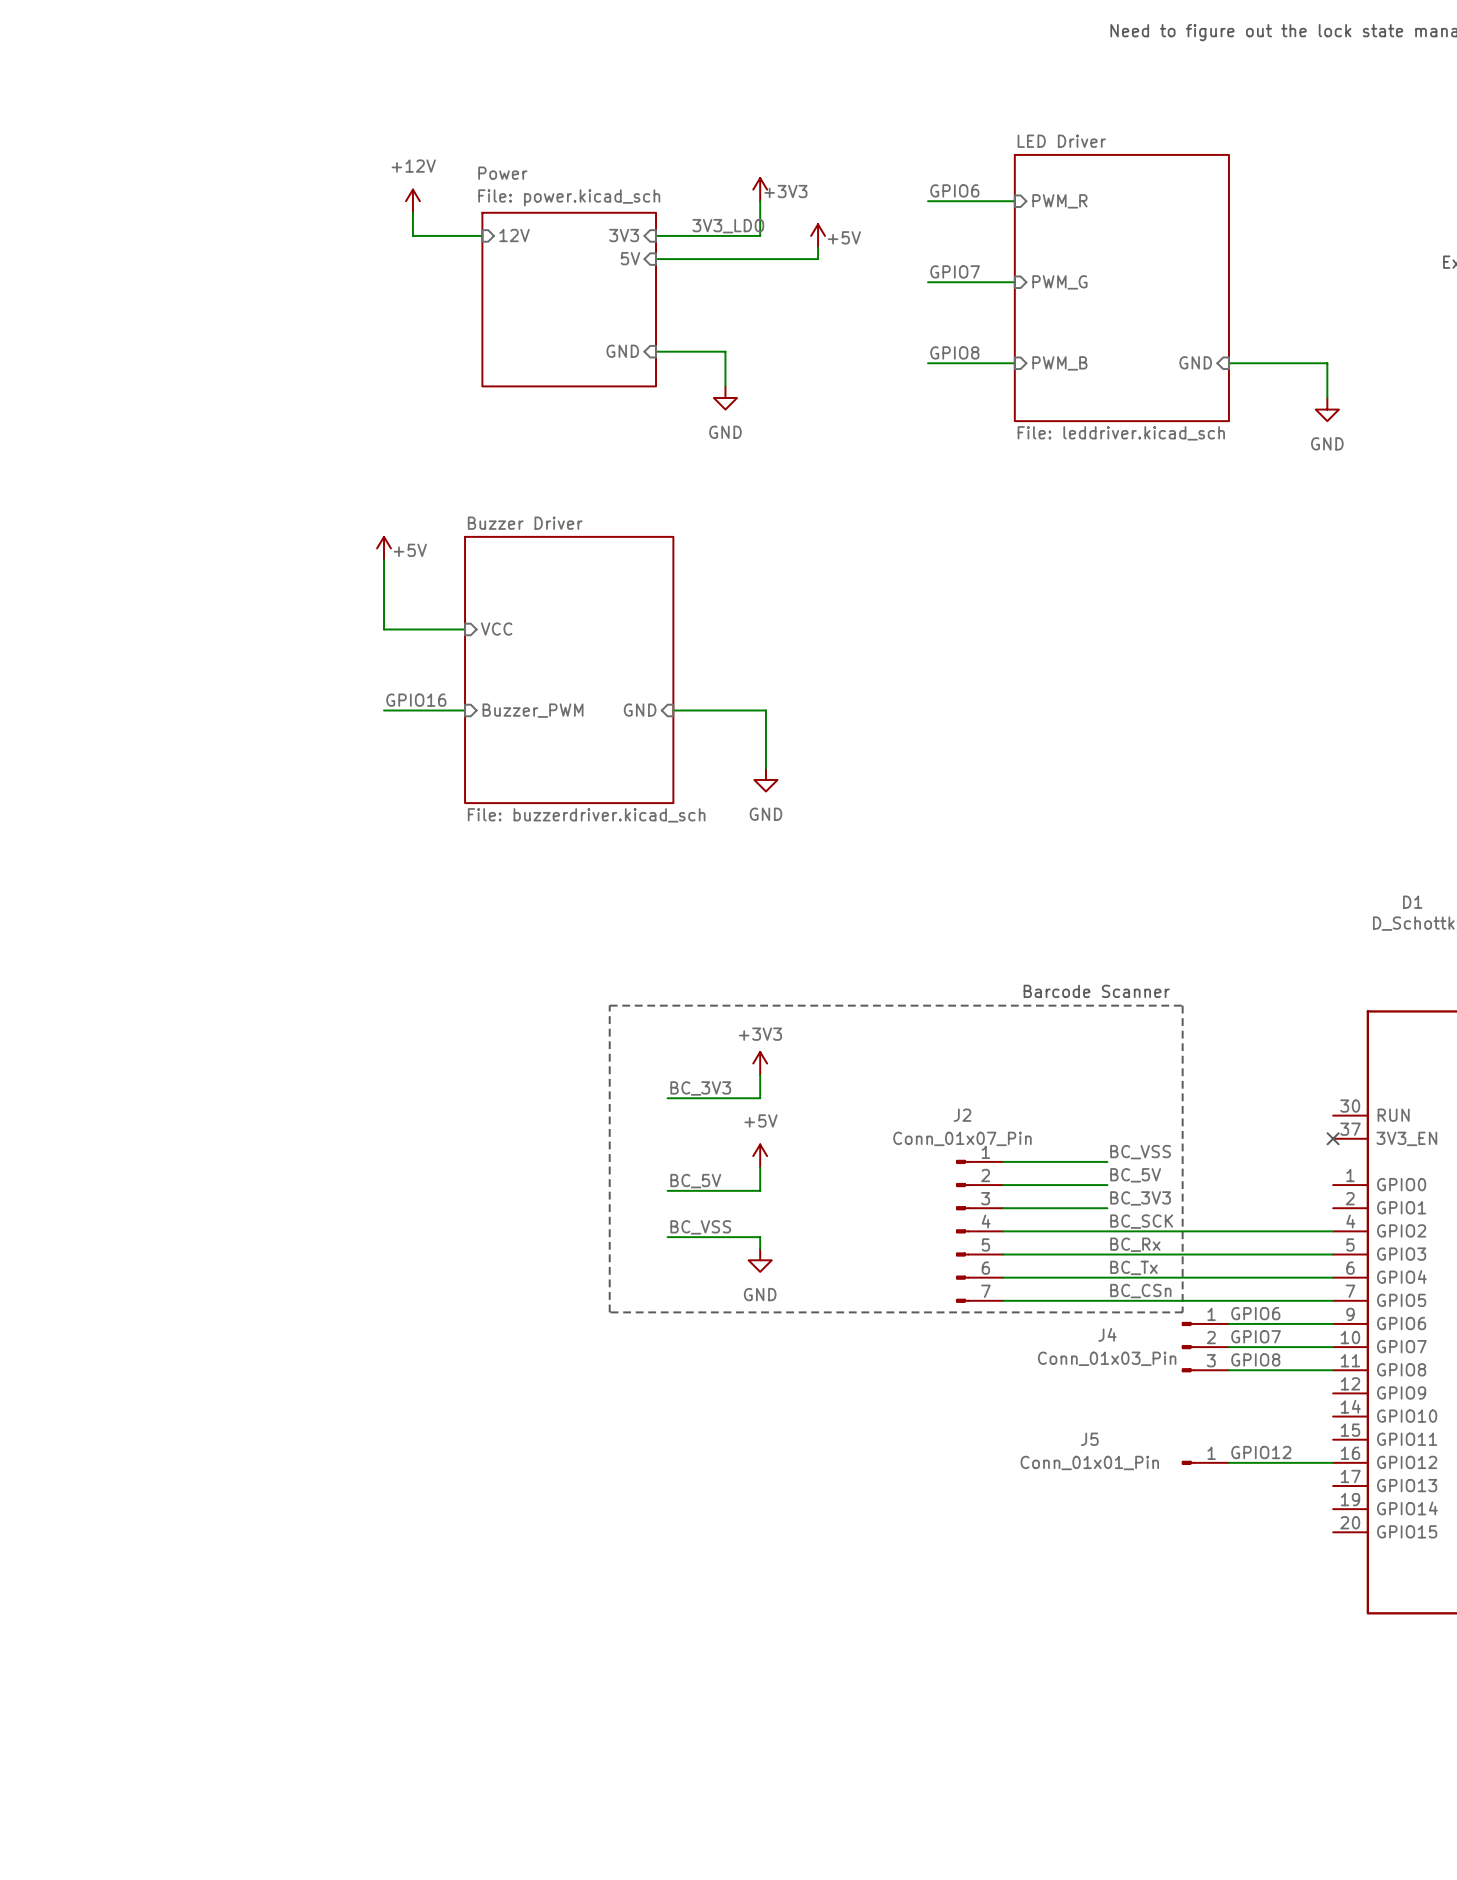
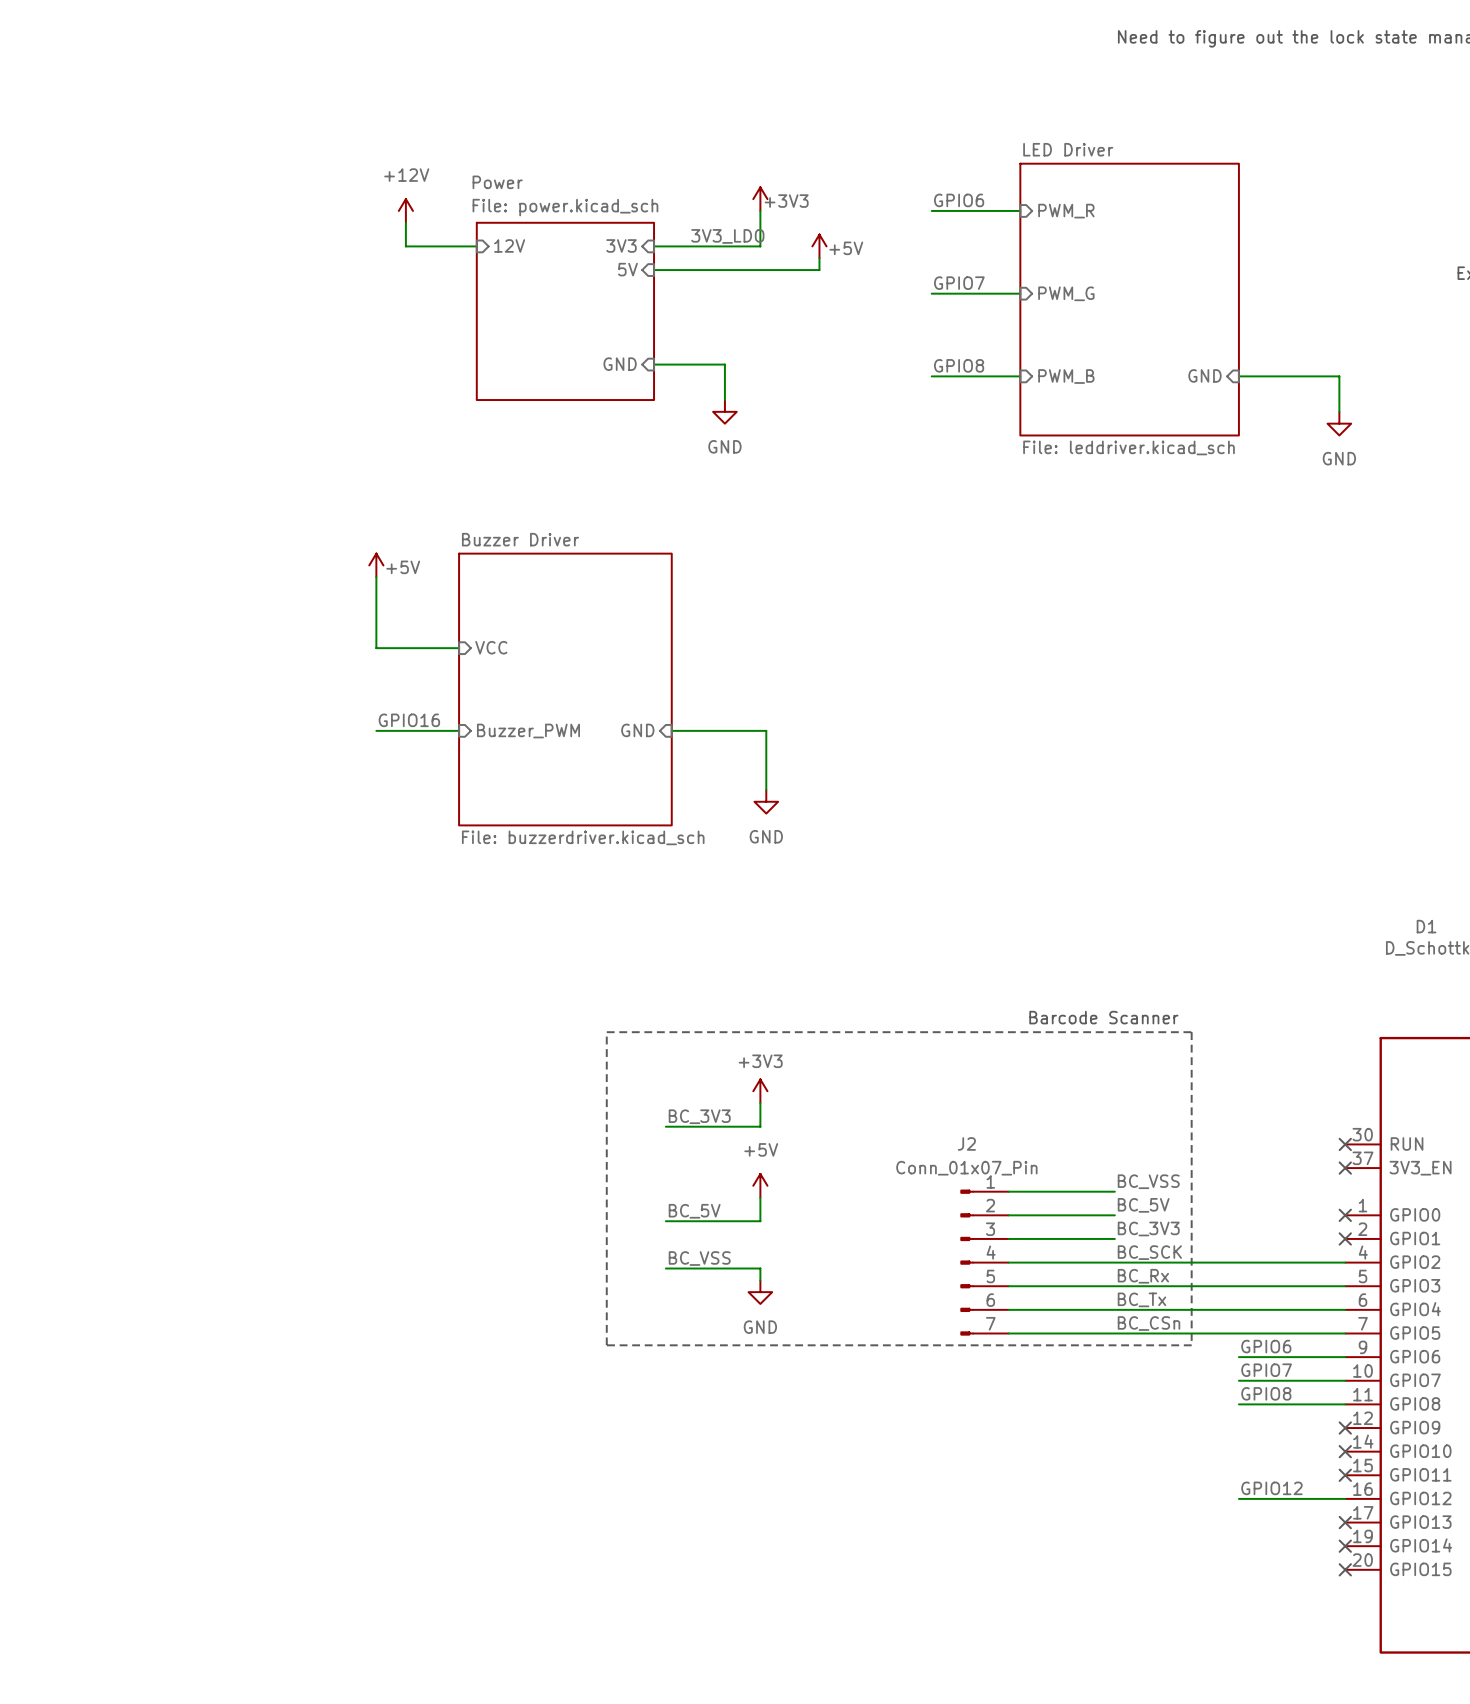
no-connect mark: none -> (1345, 1144)
no-connect mark: none -> (1345, 1215)
no-connect mark: none -> (1345, 1238)
J4: Conn_01x03_Pin (1205, 1347) -> none
no-connect mark: none -> (1345, 1428)
no-connect mark: none -> (1345, 1451)
no-connect mark: none -> (1345, 1475)
J5: Conn_01x01_Pin (1205, 1462) -> none
no-connect mark: none -> (1345, 1522)
no-connect mark: none -> (1345, 1546)
no-connect mark: none -> (1345, 1569)

